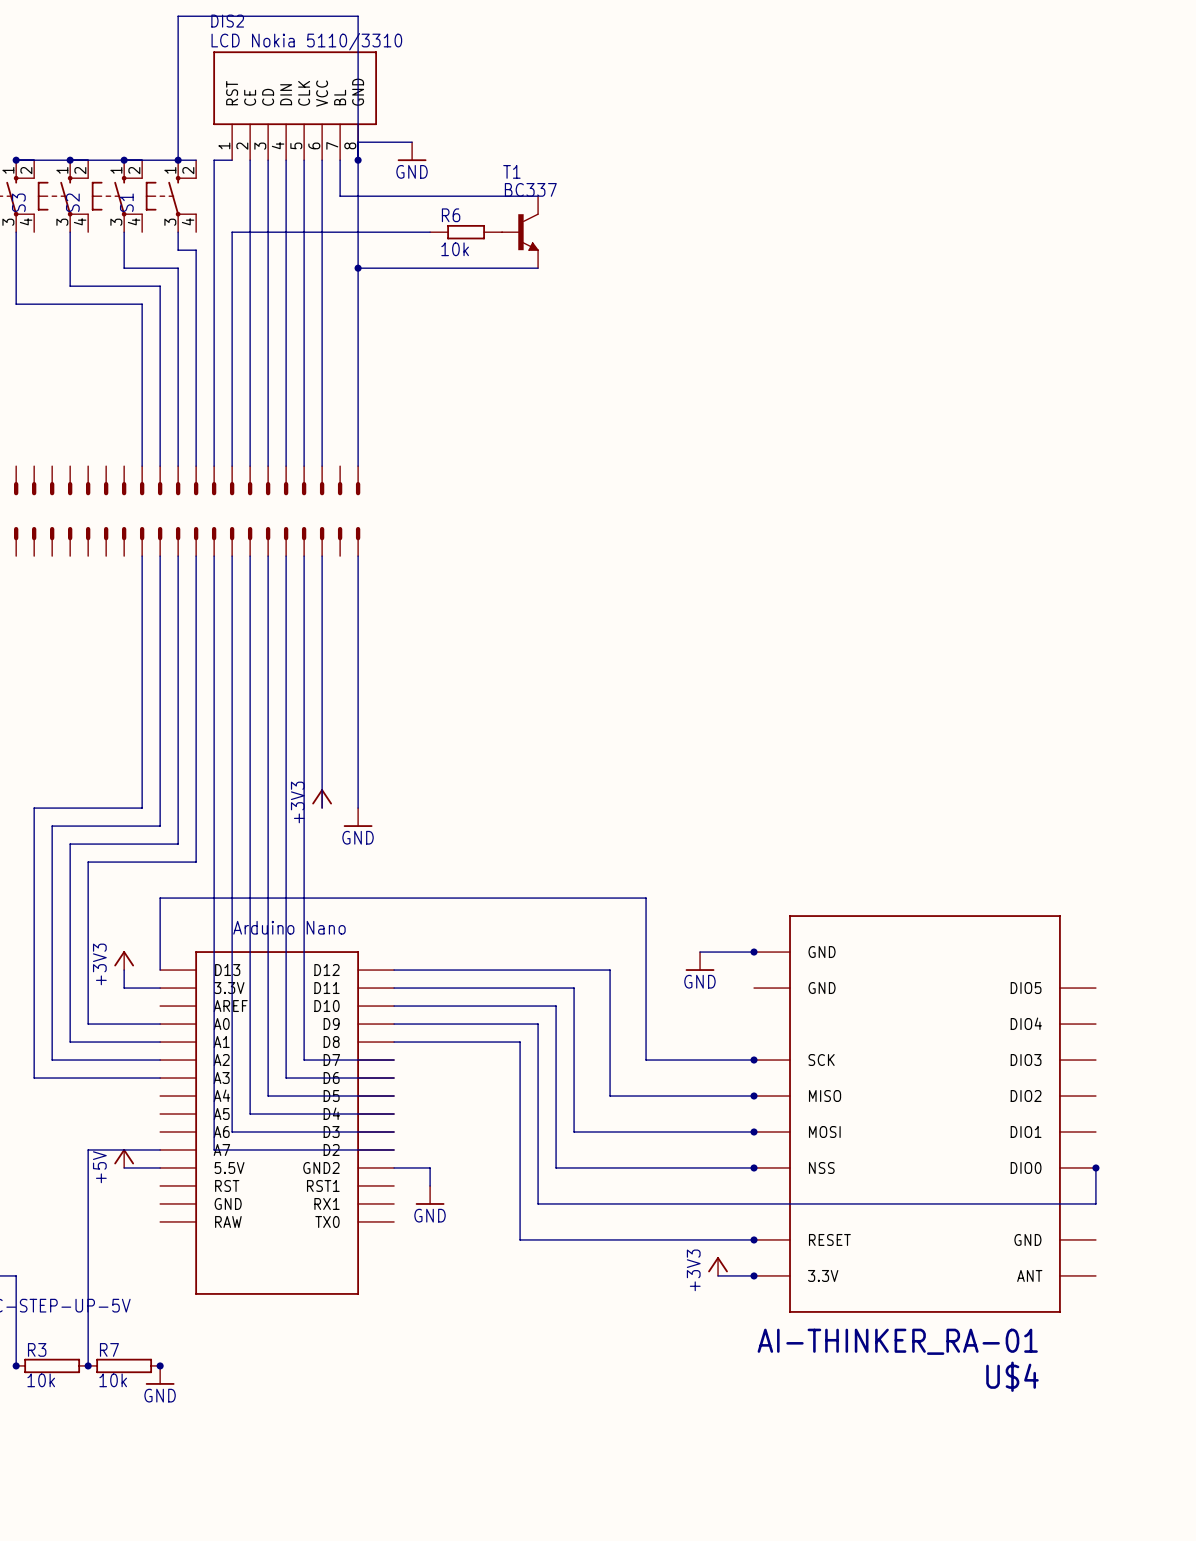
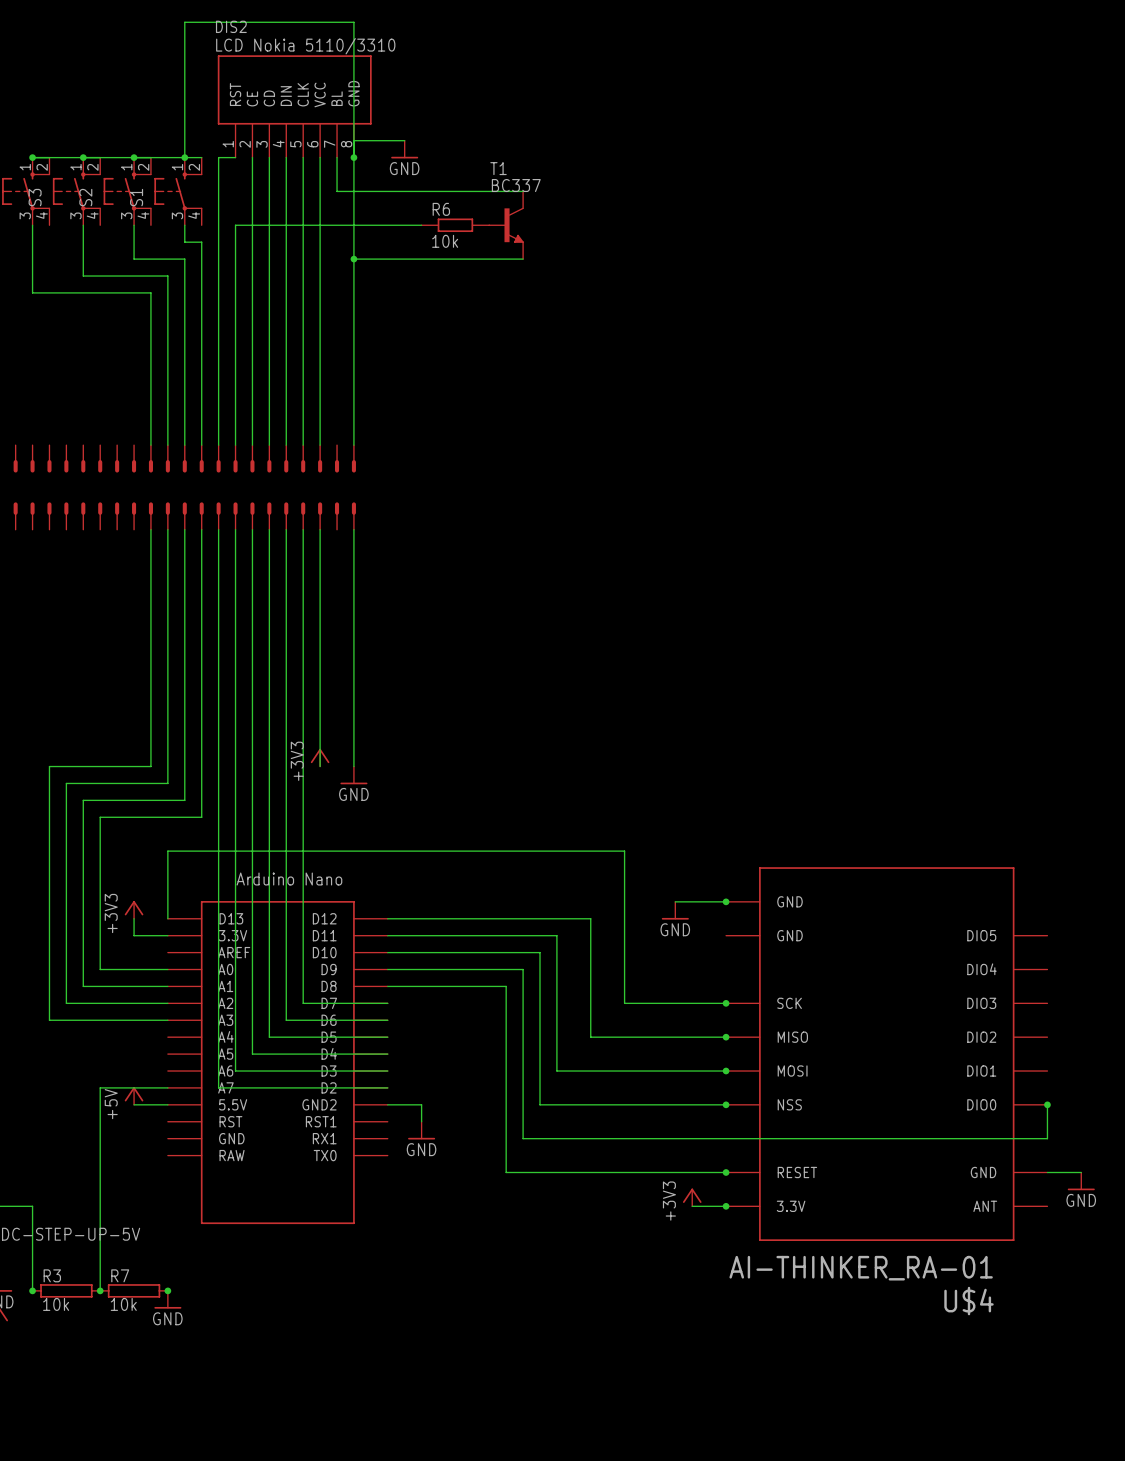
wire: none -> (1047, 1172) (1081, 1172)
power symbol: none -> GND (1081, 1181)

